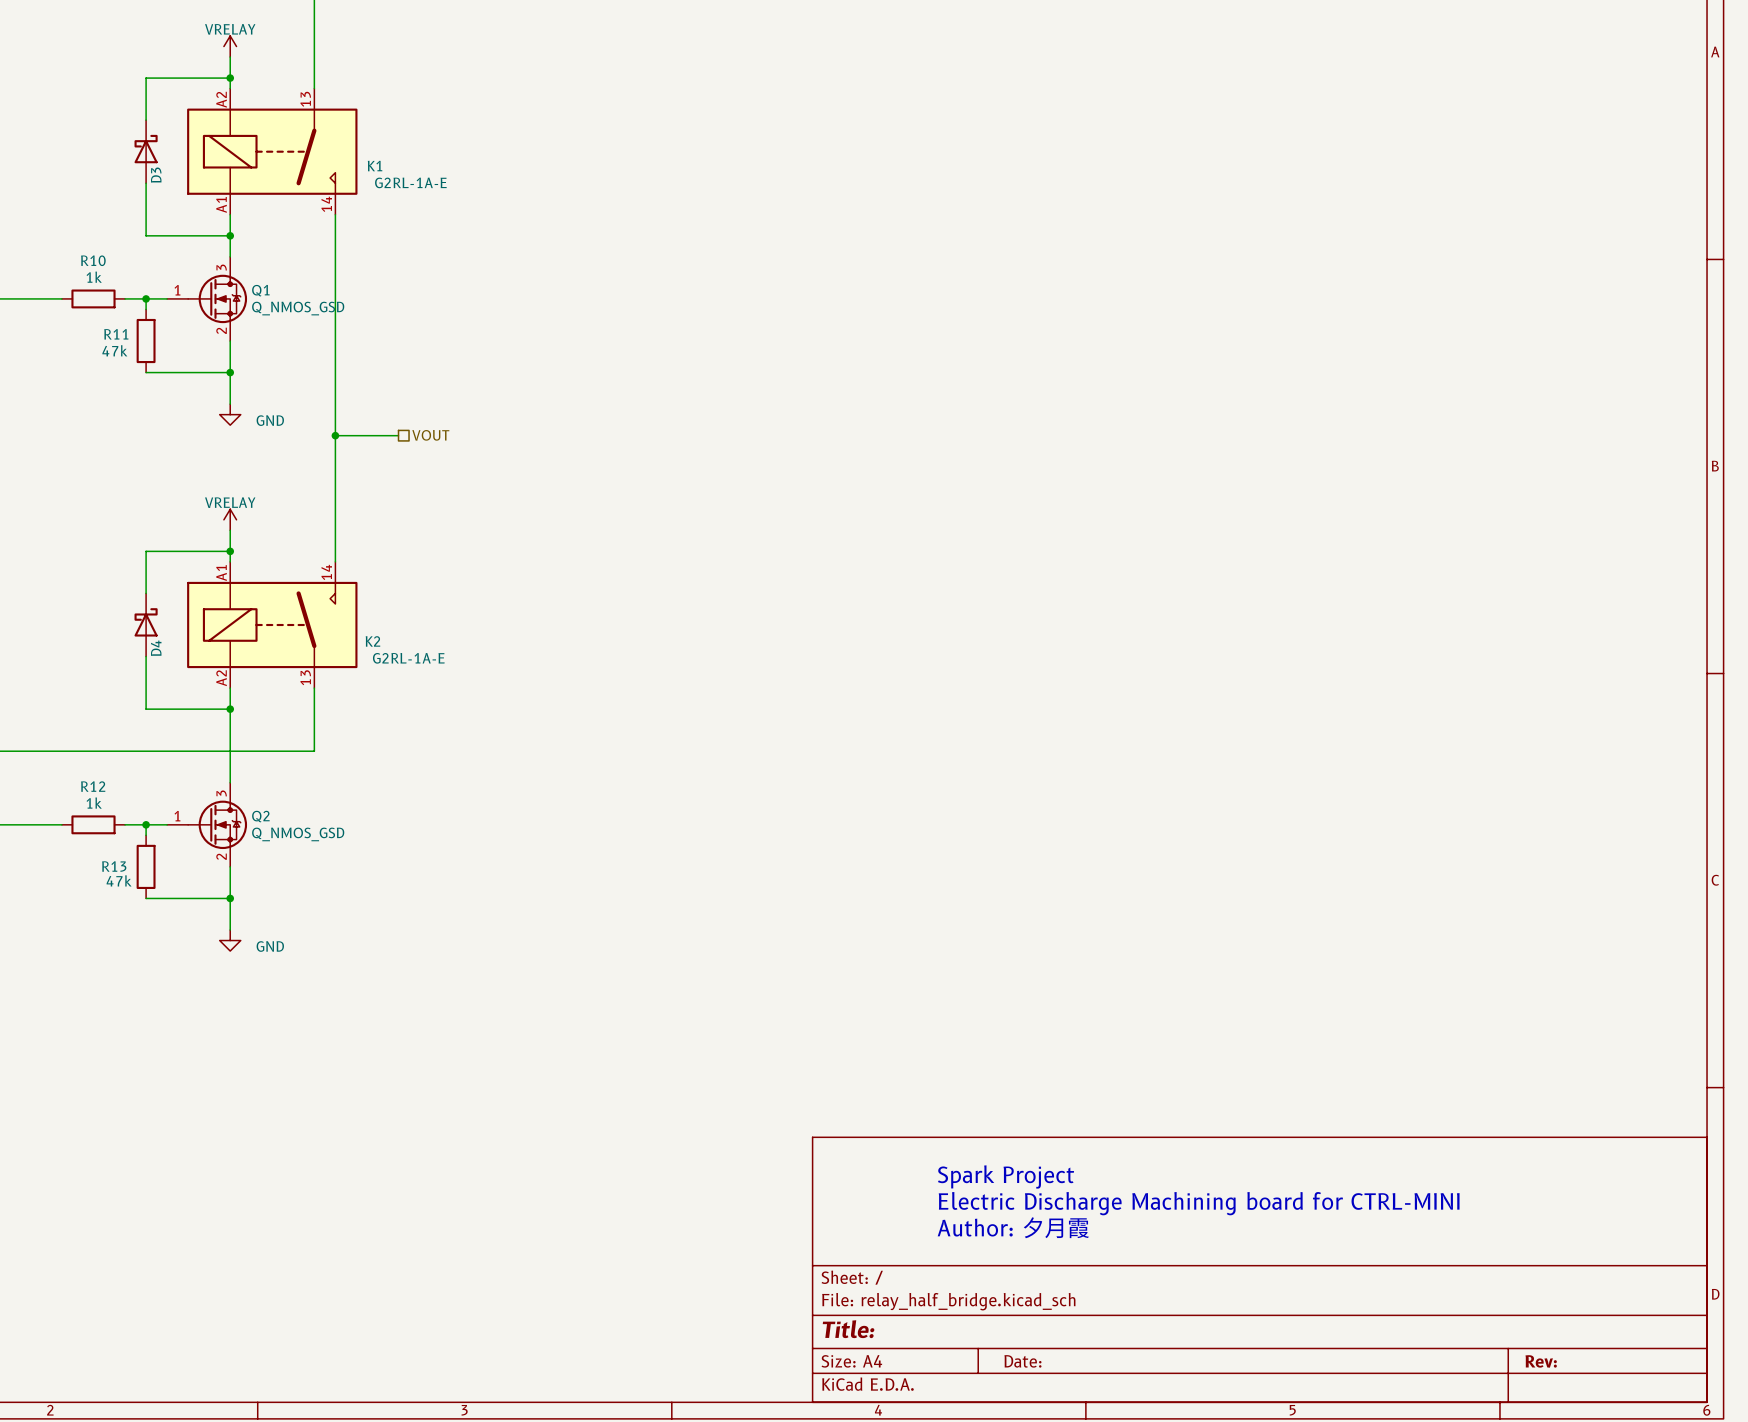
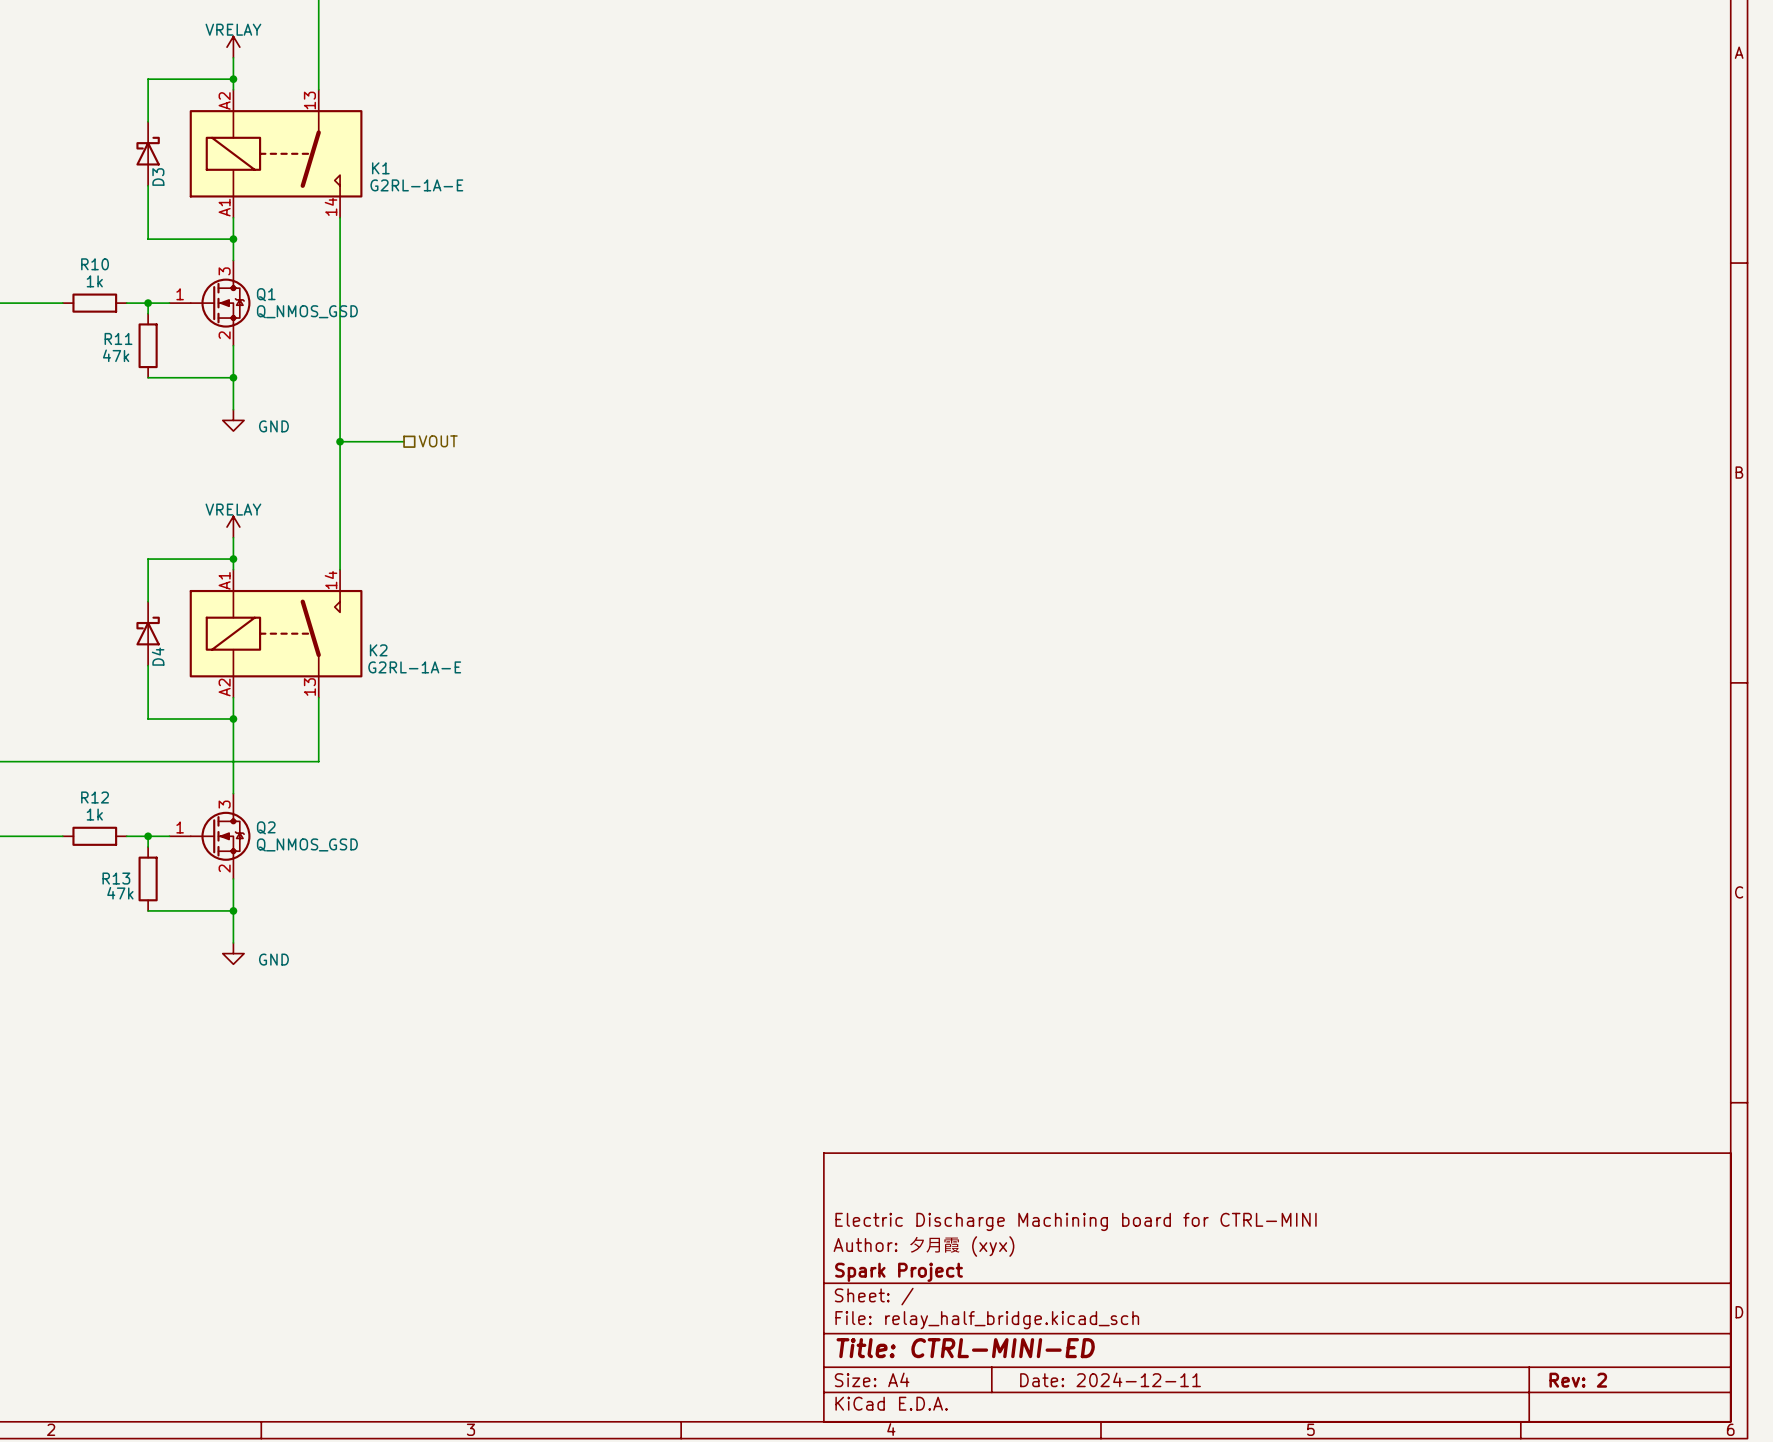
text: Spark Project (1005, 1176) -> none
text: Electric Discharge Machining board for CTRL-MINI (1199, 1203) -> none
title block: none -> Electric Discharge Machining board for CTRL-MINI (1076, 1221)
text: Author: 夕月霞 (1013, 1227) -> none
title block: none -> Author: 夕月霞 (xyx) (923, 1246)
title block: none -> Spark Project (899, 1272)
title block: Title: (848, 1329) -> Title: CTRL-MINI-ED (965, 1348)
title block: Date: (1022, 1361) -> Date: 2024-12-11 (1110, 1379)
title block: Rev: (1541, 1361) -> Rev: 2 (1578, 1380)

